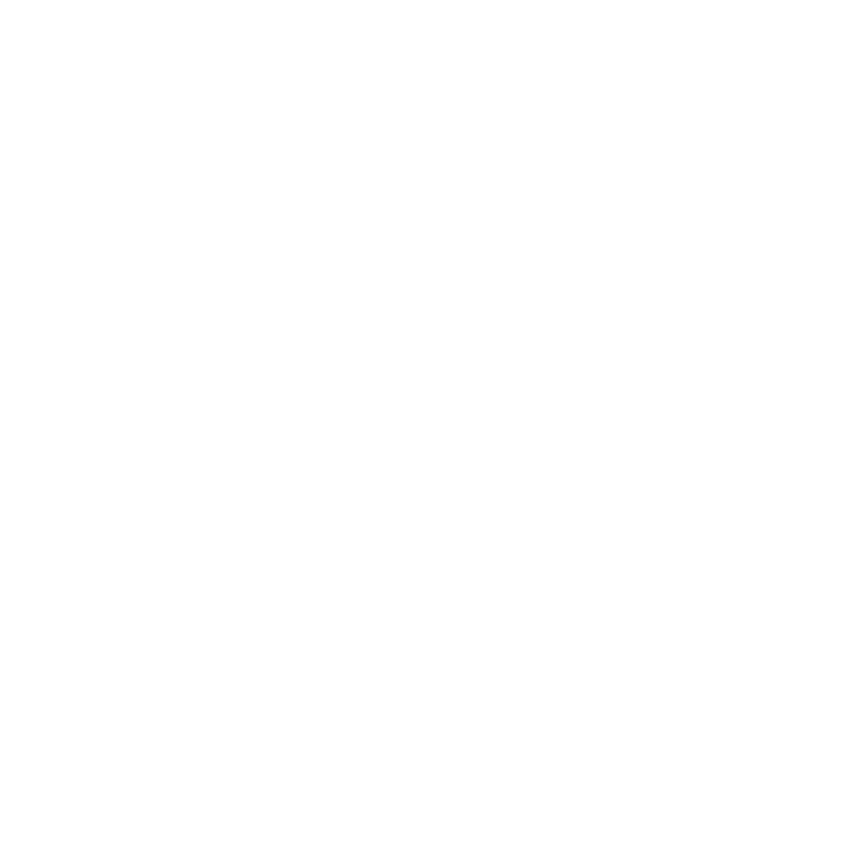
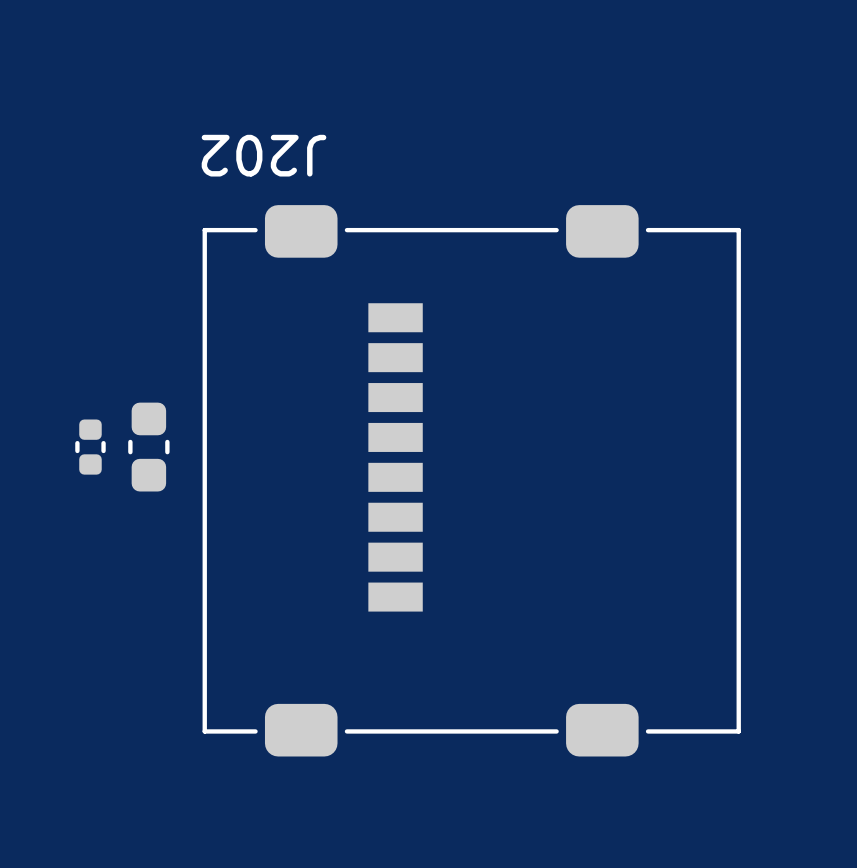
part: none -> (90, 447)
part: none -> (148, 447)
J202: none -> (471, 480)

